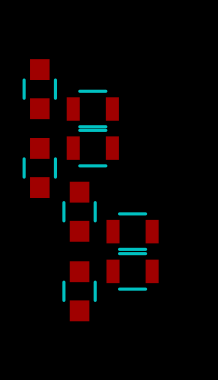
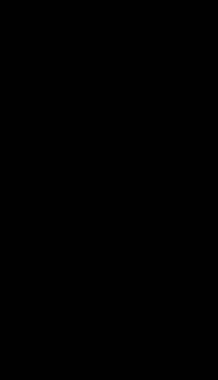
part: (39, 89) -> none
part: (92, 109) -> none
part: (92, 148) -> none
part: (39, 168) -> none
part: (79, 211) -> none
part: (132, 231) -> none
part: (132, 271) -> none
part: (79, 291) -> none

